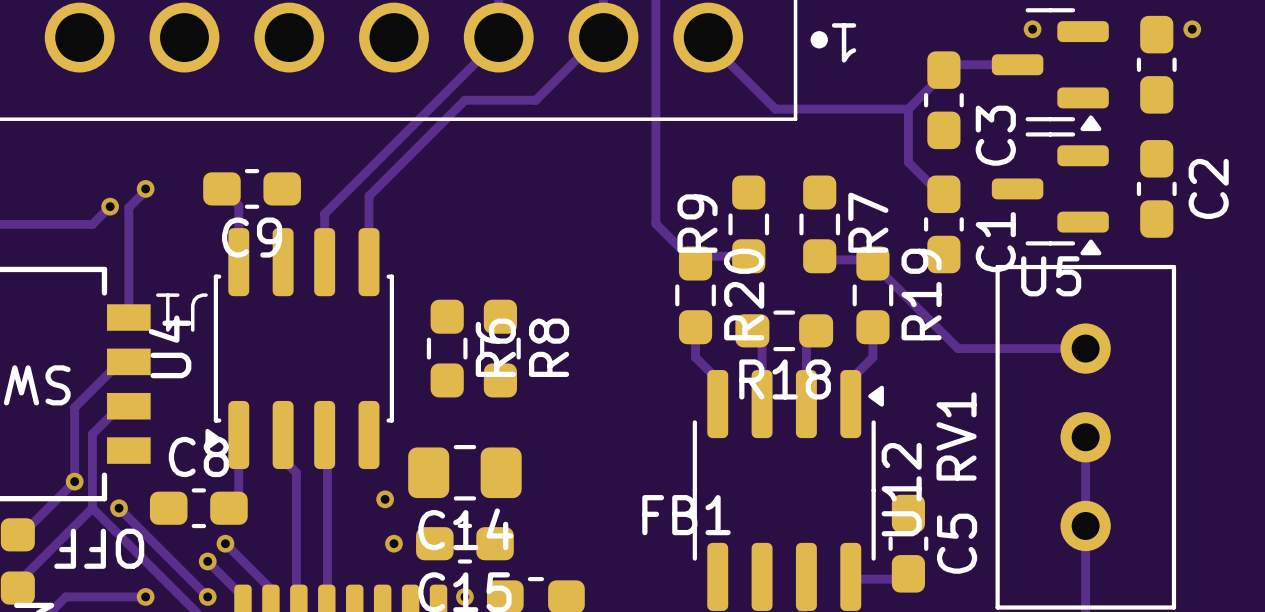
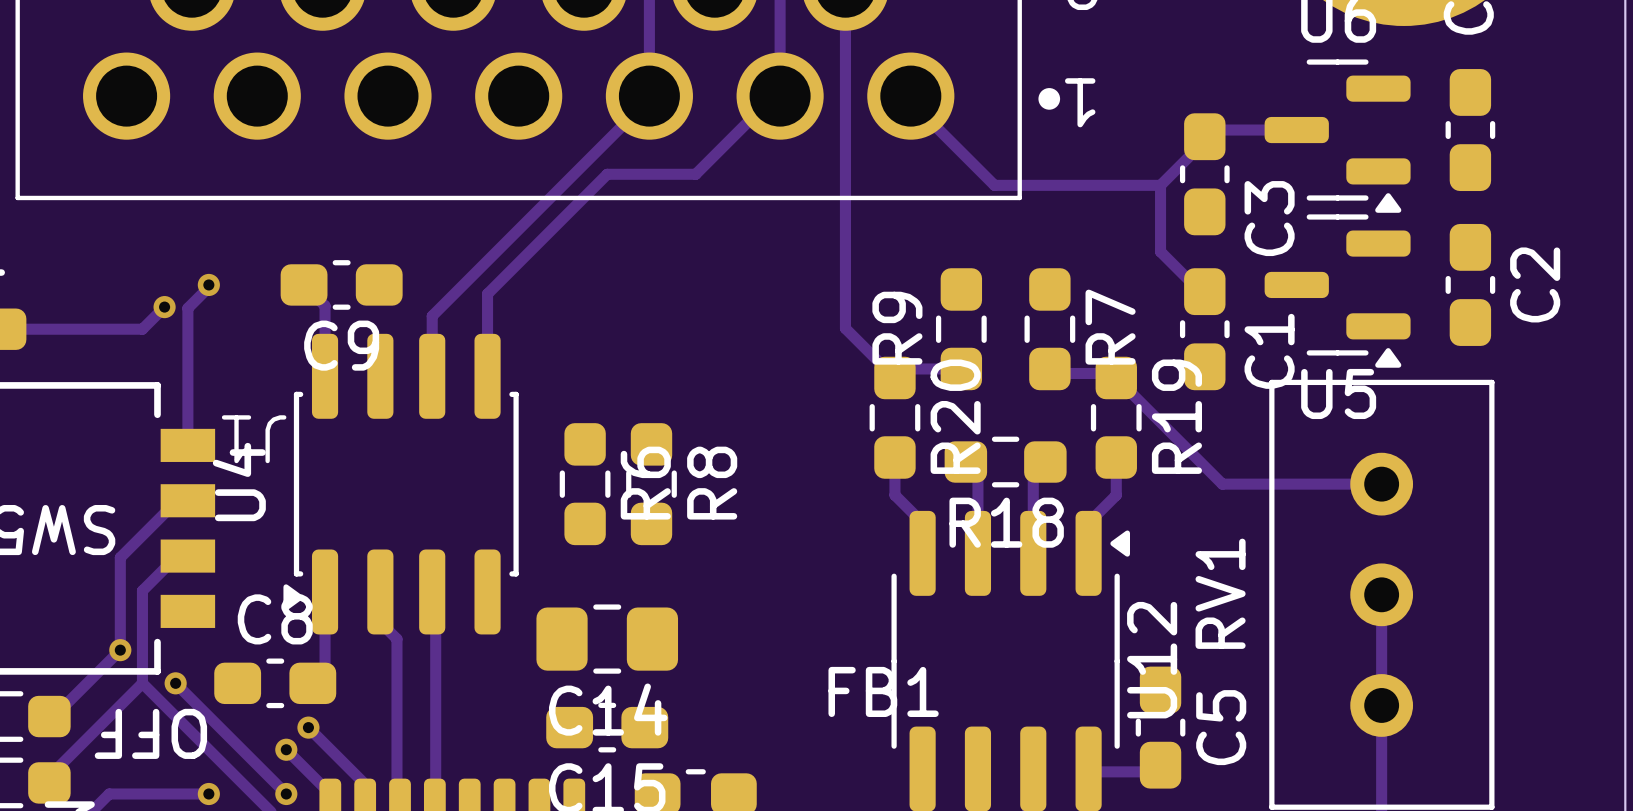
via: (1032, 29) -> none
via: (1192, 29) -> none
via: (385, 499) -> none
via: (393, 543) -> none
via: (464, 596) -> none

